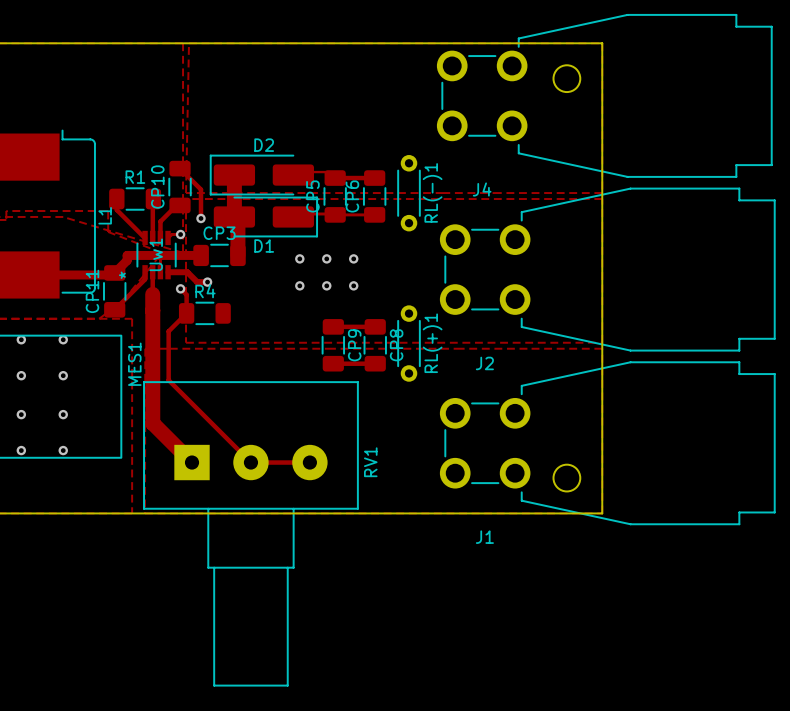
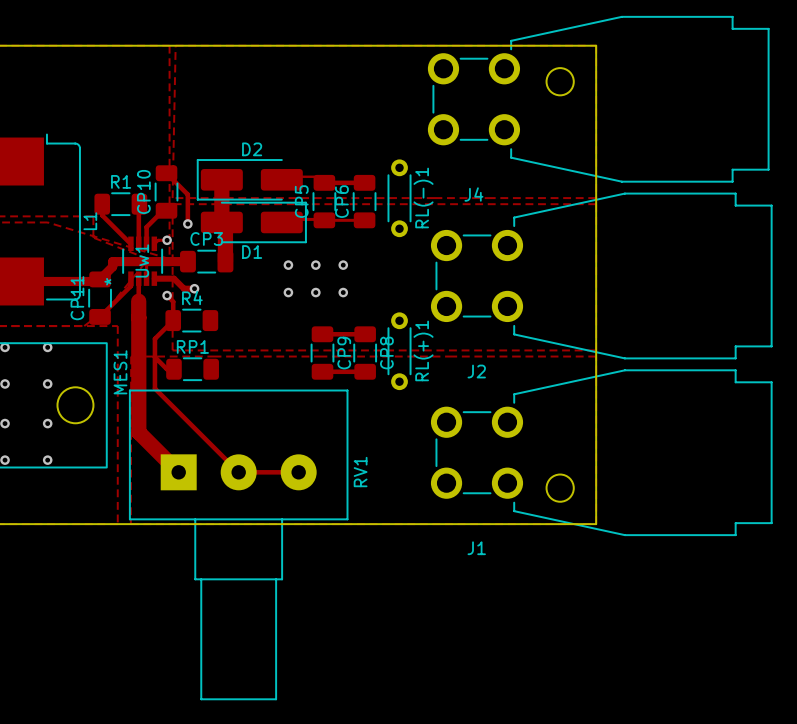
track: none -> (154, 357) (166, 369) (173, 369)
RP1: none -> (192, 369)
round board edge: none -> [56, 386, 95, 424]

